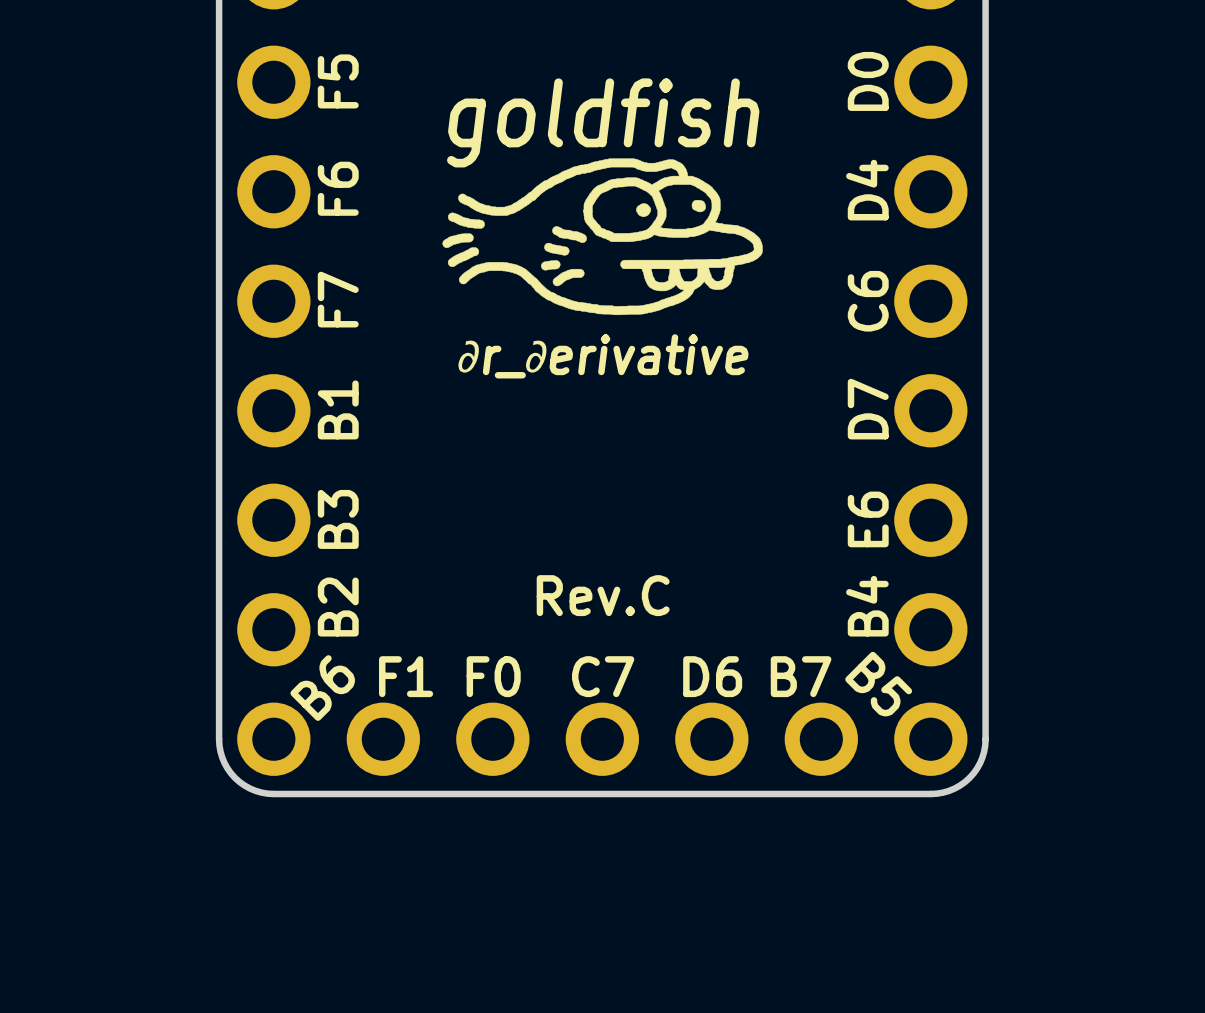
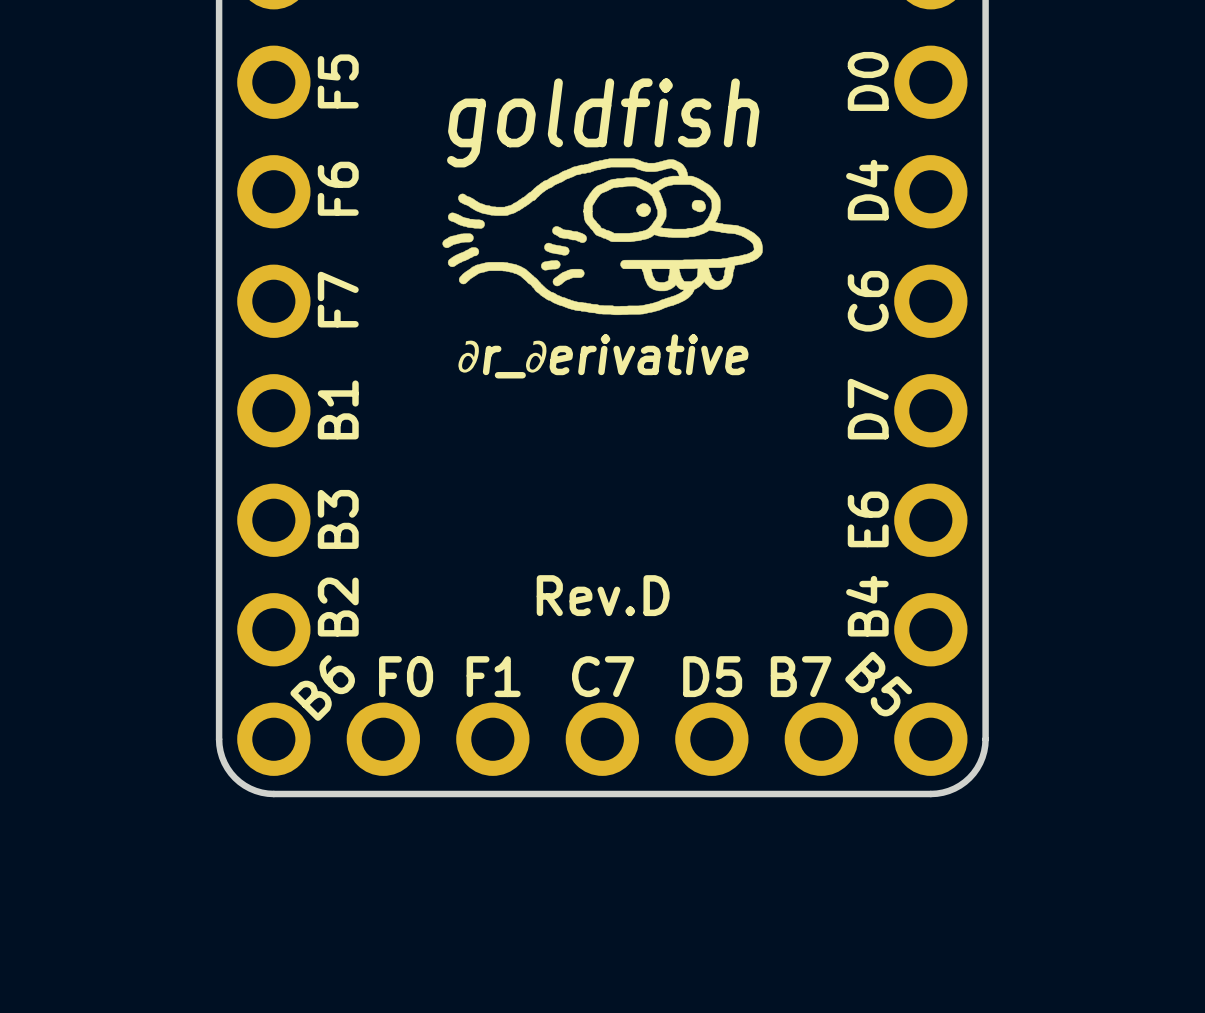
text: Rev.C (603, 595) -> Rev.D (603, 595)
text: F1 (406, 676) -> F0 (406, 676)
text: F0 (493, 676) -> F1 (493, 676)
text: D6 (712, 676) -> D5 (712, 676)

